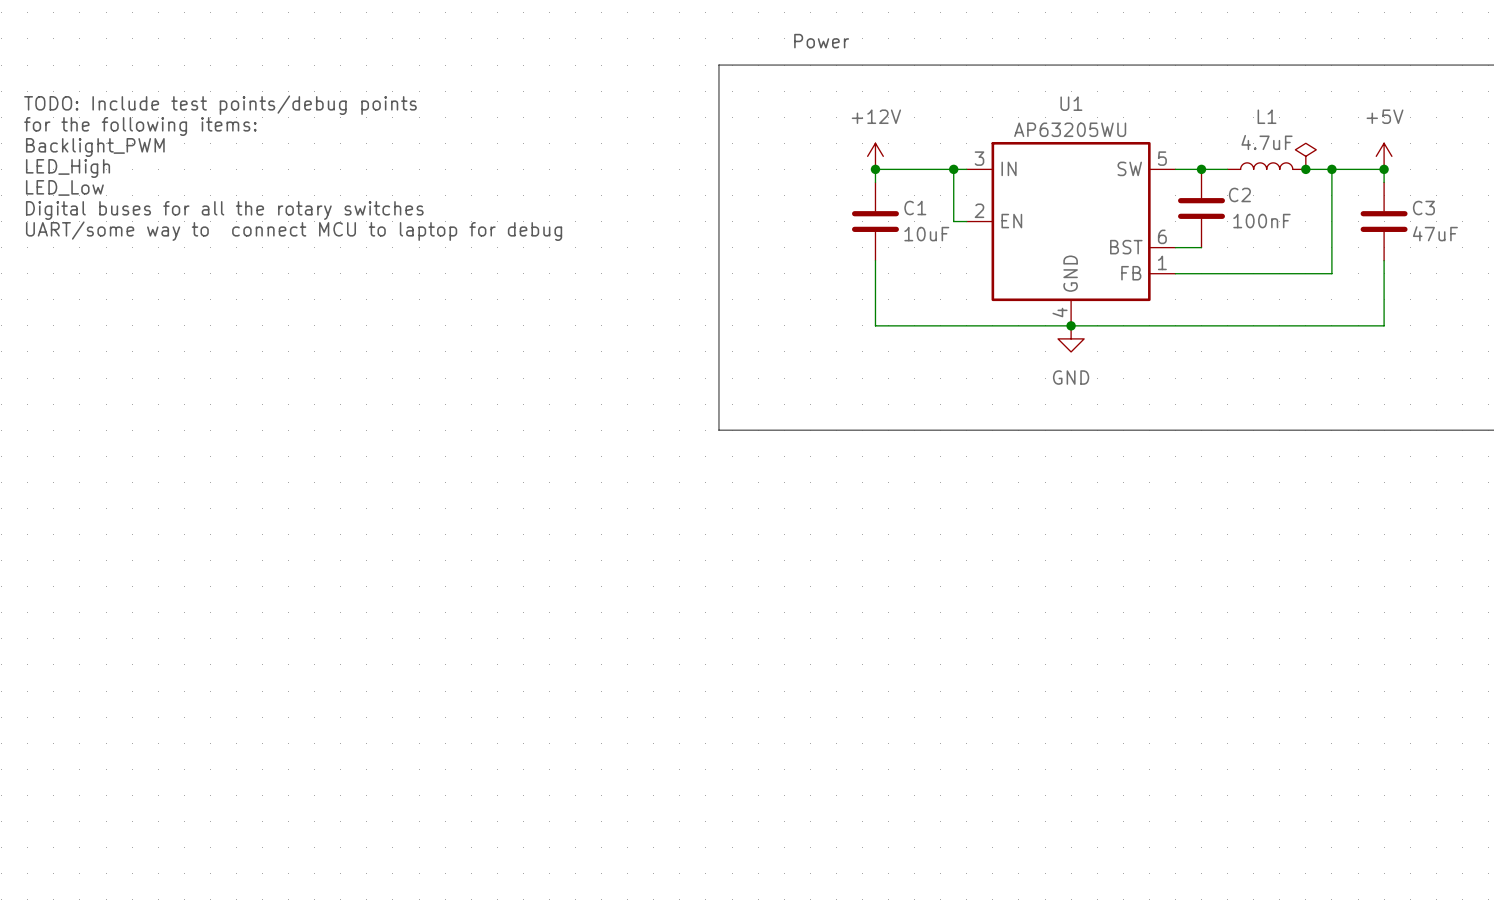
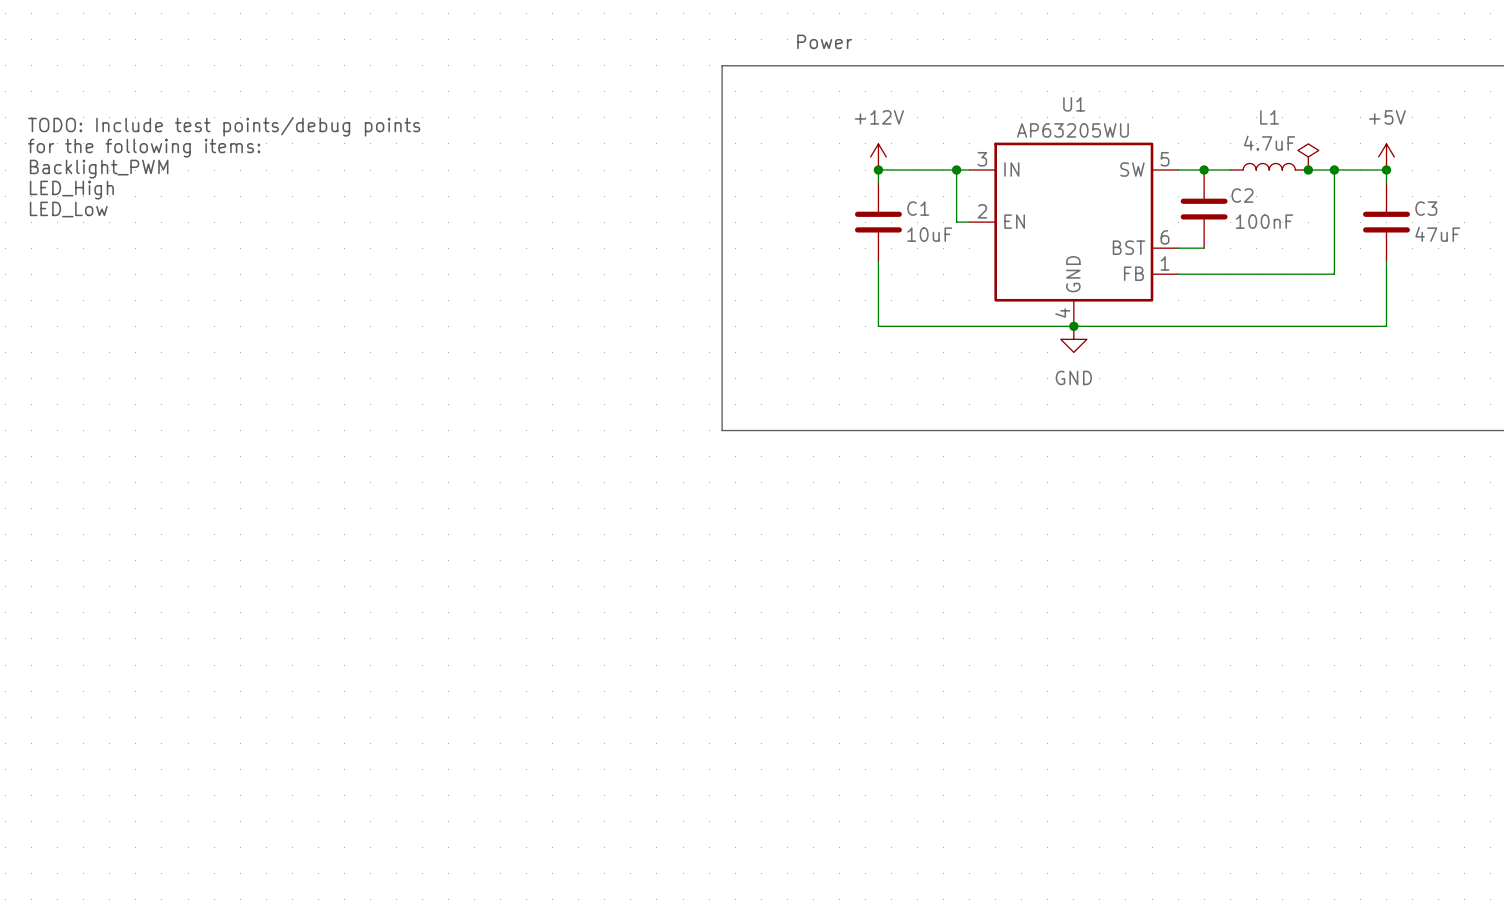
text: TODO: Include test points/debug points (220, 105) -> none
text: for the following items: (140, 126) -> TODO: Include test points/debug points (224, 126)
text: Backlight_PWM (95, 147) -> for the following items: (144, 148)
text: LED_High (68, 168) -> Backlight_PWM (99, 169)
text: LED_Low (64, 187) -> LED_High (71, 190)
text: Digital buses for all the rotary switches (224, 210) -> LED_Low (68, 209)
text: UART/some way to connect MCU to laptop for debug (294, 231) -> none

